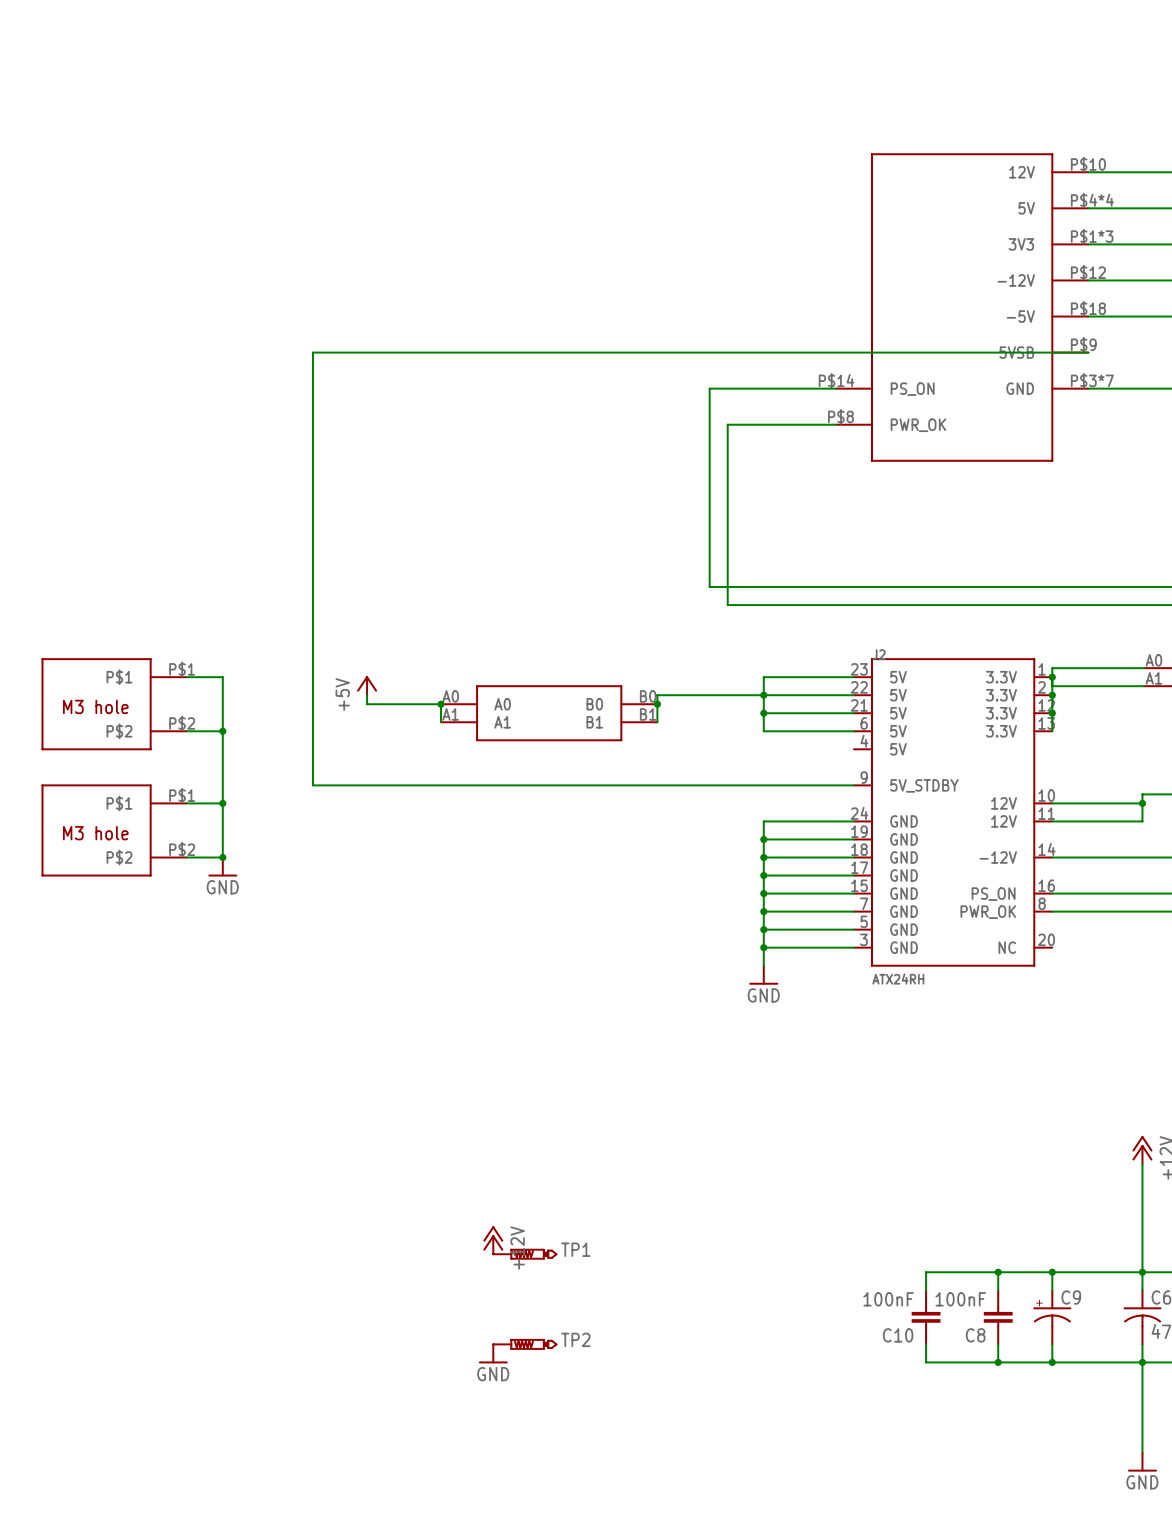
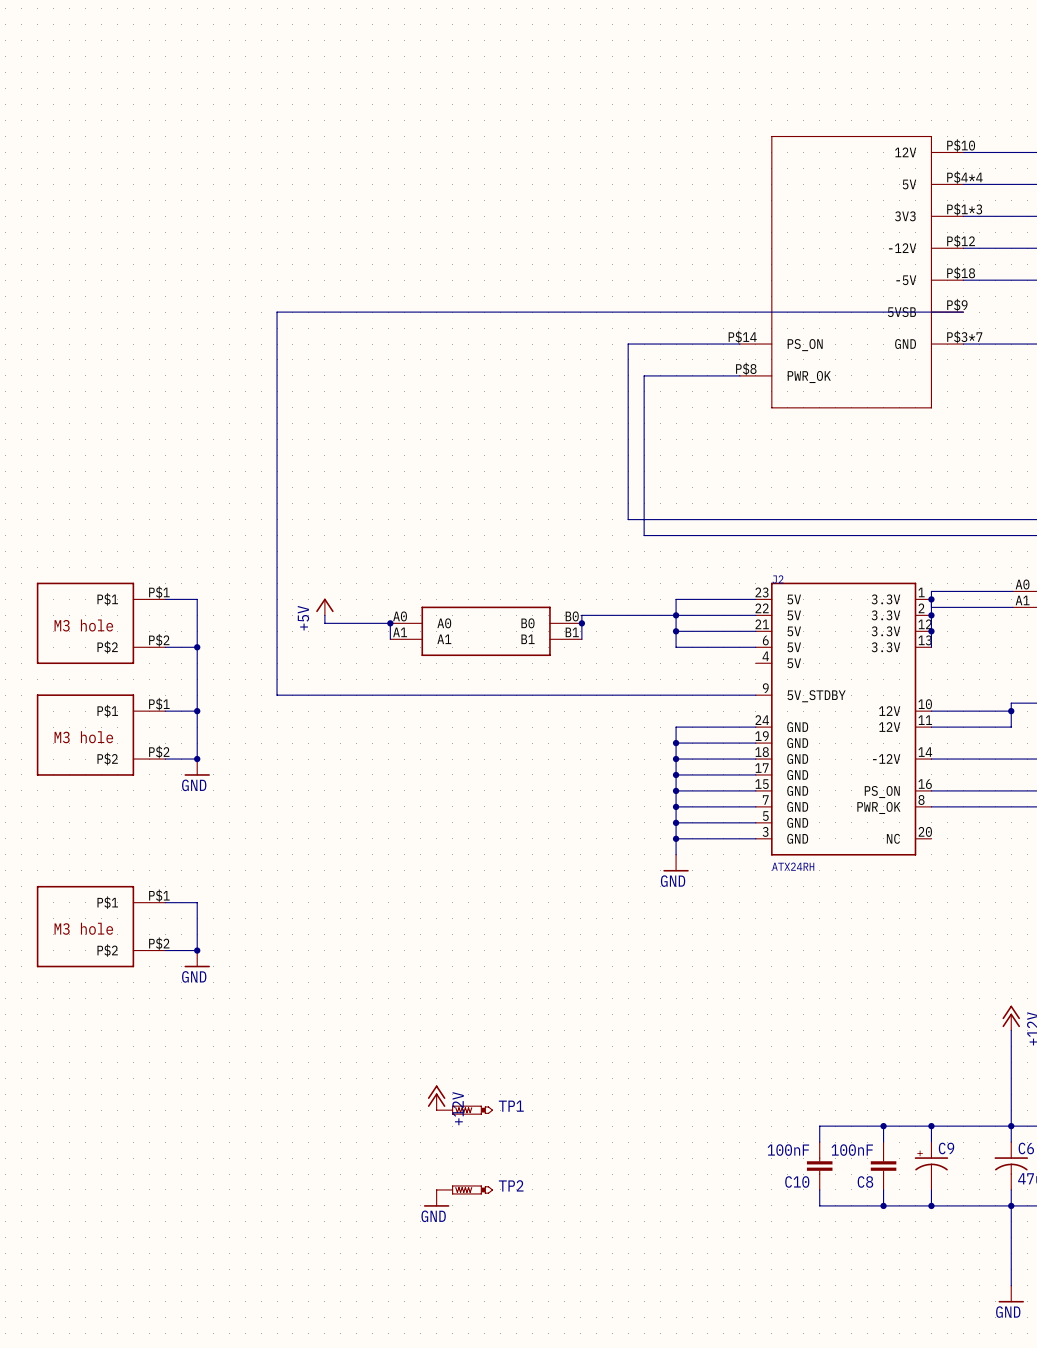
wire: none -> (165, 902) (197, 902) (197, 950) (165, 950)
part: none -> (101, 926)
junction: none -> (197, 950)
power symbol: none -> GND (197, 958)

